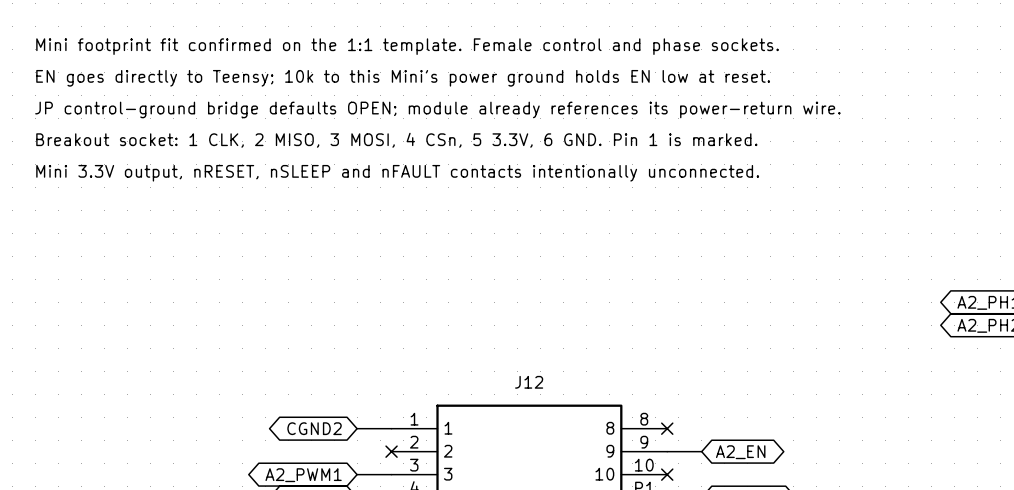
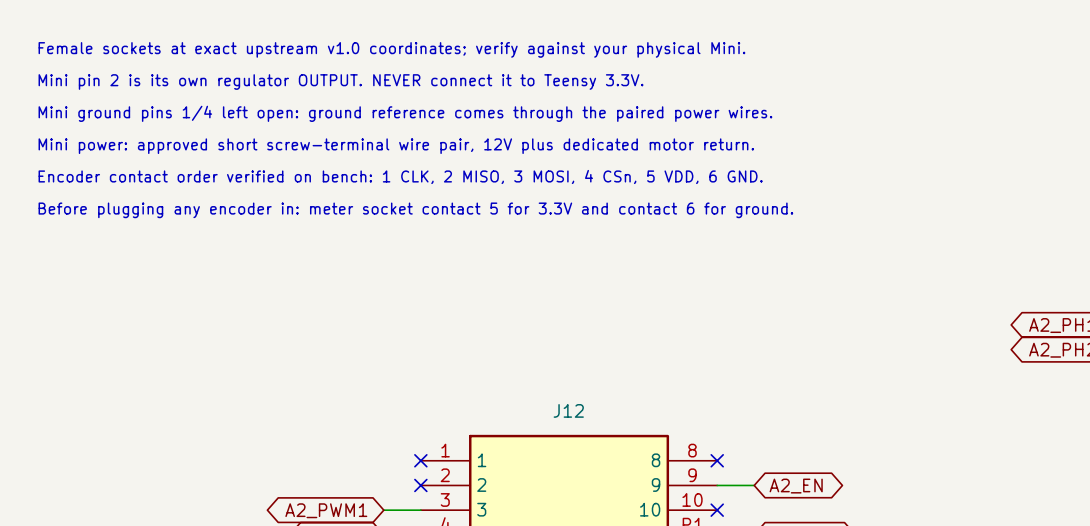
text: Mini footprint fit confirmed on the 1:1 template. Female control and phase sockets. (407, 46) -> Female sockets at exact upstream v1.0 coordinates; verify against your physical Mini. (391, 49)
text: EN goes directly to Teensy; 10k to this Mini's power ground holds EN low at reset. (403, 78) -> Mini pin 2 is its own regulator OUTPUT. NEVER connect it to Teensy 3.3V. (341, 82)
text: JP control-ground bridge defaults OPEN; module already references its power-return wire. (437, 109) -> Mini ground pins 1/4 left open: ground reference comes through the paired power wires. (405, 113)
text: Breakout socket: 1 CLK, 2 MISO, 3 MOSI, 4 CSn, 5 3.3V, 6 GND. Pin 1 is marked. (396, 140) -> Mini power: approved short screw-terminal wire pair, 12V plus dedicated motor return. (396, 146)
text: Mini 3.3V output, nRESET, nSLEEP and nFAULT contacts intentionally unconnected. (397, 173) -> Encoder contact order verified on bench: 1 CLK, 2 MISO, 3 MOSI, 4 CSn, 5 VDD, 6 GND. (400, 176)
text: none -> Before plugging any encoder in: meter socket contact 5 for 3.3V and contact 6 for ground. (415, 210)
global label: CGND2 (314, 428) -> none
wire: (357, 428) (391, 428) -> none
no-connect mark: none -> (420, 460)

